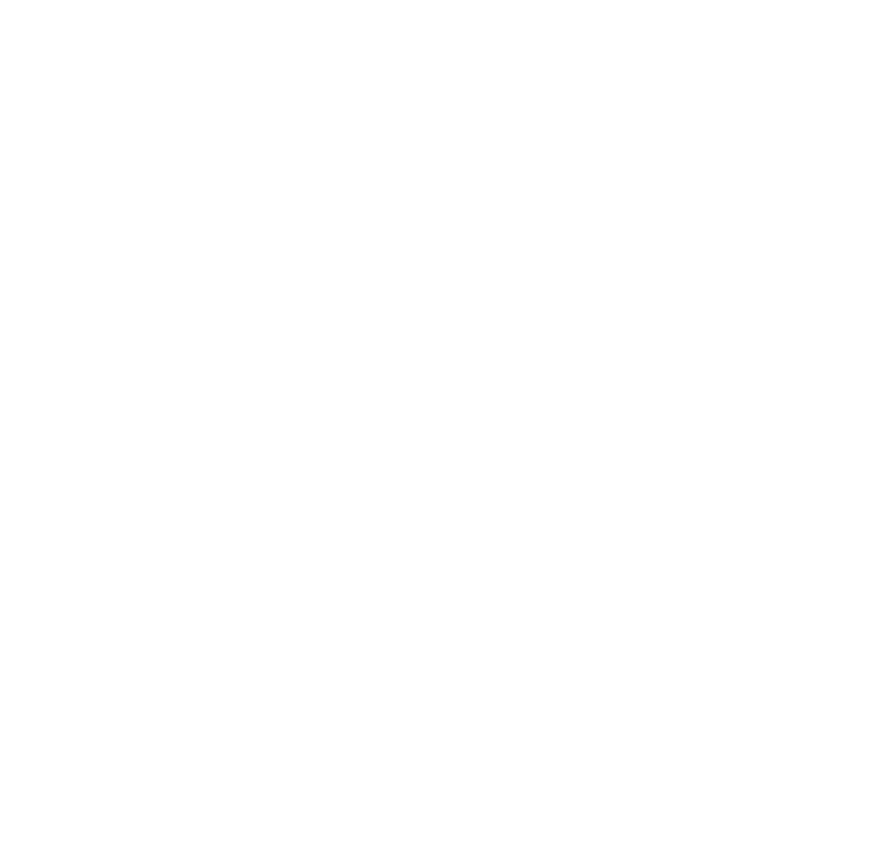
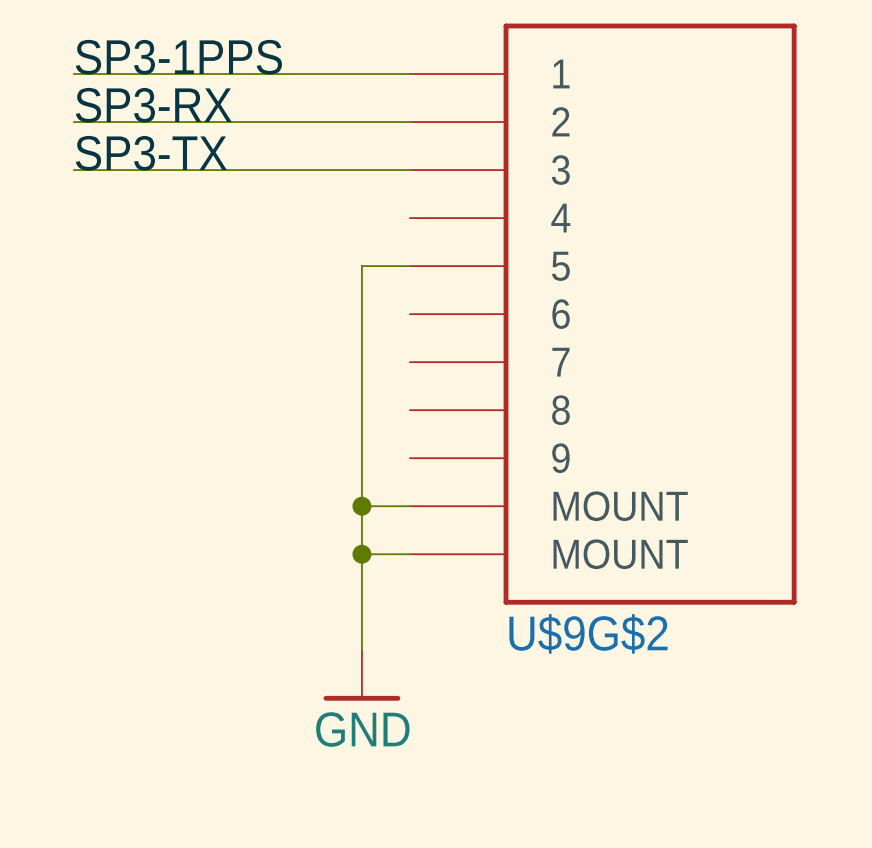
label: none -> SP3-1PPS (178, 57)
wire: none -> (73, 74) (409, 74)
label: none -> SP3-RX (153, 105)
wire: none -> (73, 122) (409, 122)
label: none -> SP3-TX (151, 153)
wire: none -> (73, 170) (409, 170)
wire: none -> (409, 266) (361, 266) (361, 650)
U$9G$2: none -> (603, 314)
wire: none -> (361, 506) (409, 506)
junction: none -> (361, 506)
wire: none -> (361, 554) (409, 554)
junction: none -> (361, 554)
power symbol: none -> GND (361, 675)

